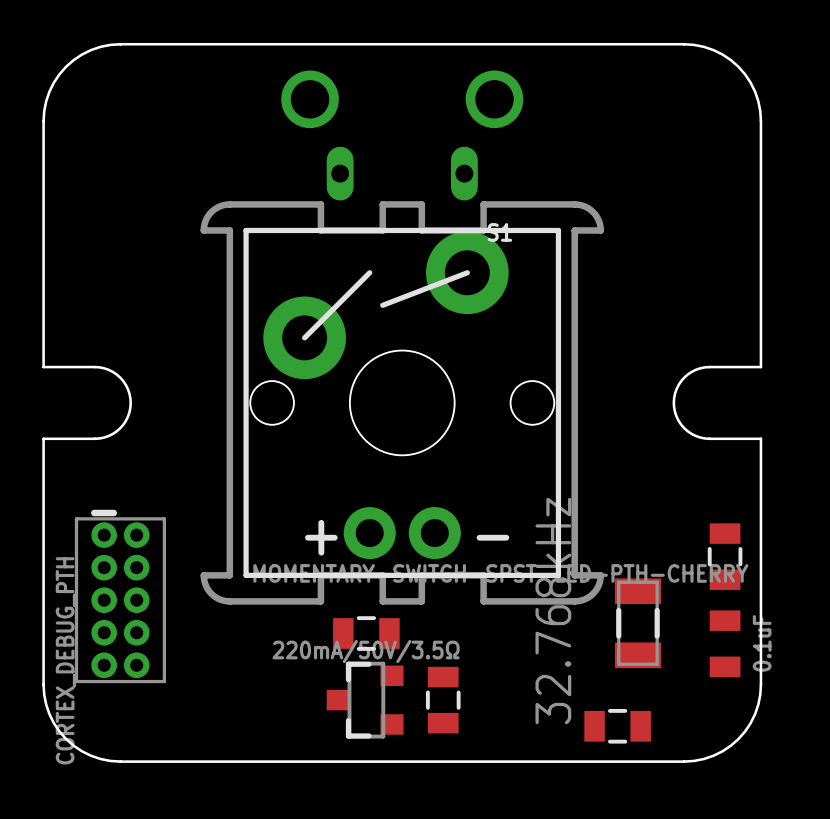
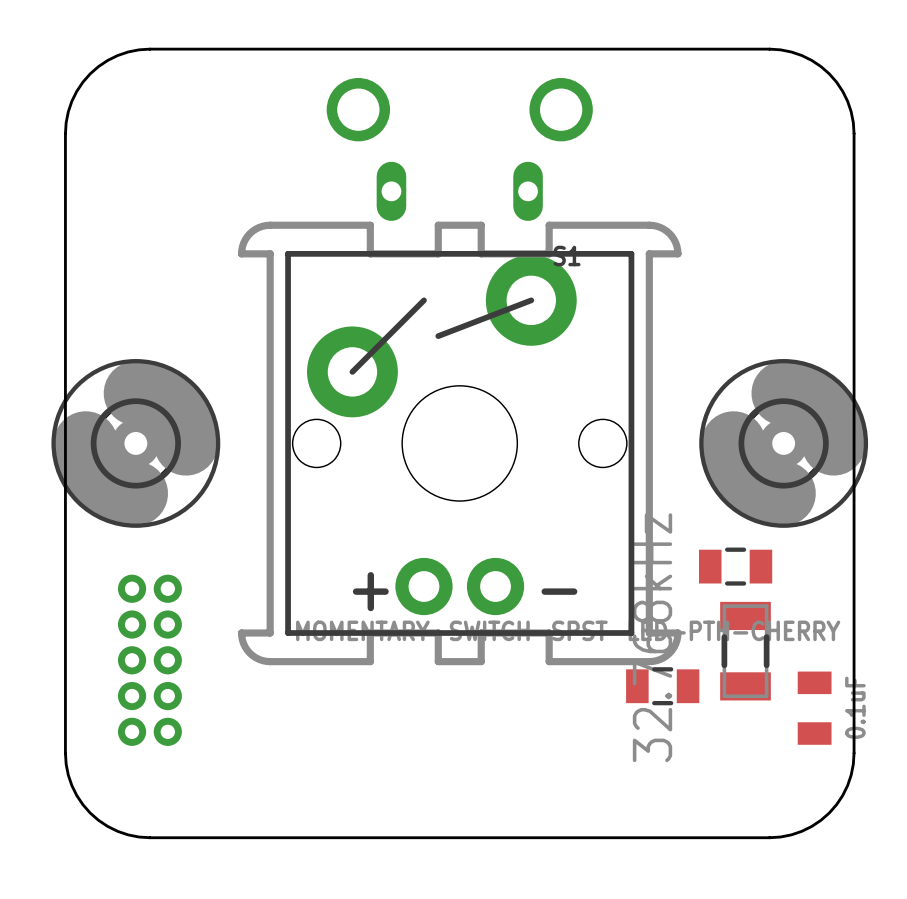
board edge: (43, 367) (94, 367) (108, 369) (123, 381) (129, 393) (130, 402) (129, 412) (123, 424) (108, 436) (94, 438) (43, 438) -> (65, 404) (65, 482)
board edge: (760, 367) (709, 367) (695, 369) (681, 381) (675, 393) (673, 402) (675, 412) (681, 424) (695, 436) (709, 438) (760, 438) -> (854, 404) (854, 482)
part: none -> (135, 443)
part: none -> (783, 443)
part: none -> (735, 566)
part: (725, 556) -> none
part side: top (120, 596) -> bottom (149, 660)
part: none -> (662, 686)
part position: (637, 623) -> (745, 651)
part: (366, 633) -> none
part: 220mA/50V/3.5Ω (365, 700) -> none
part: (443, 700) -> none
part: (617, 726) -> none

